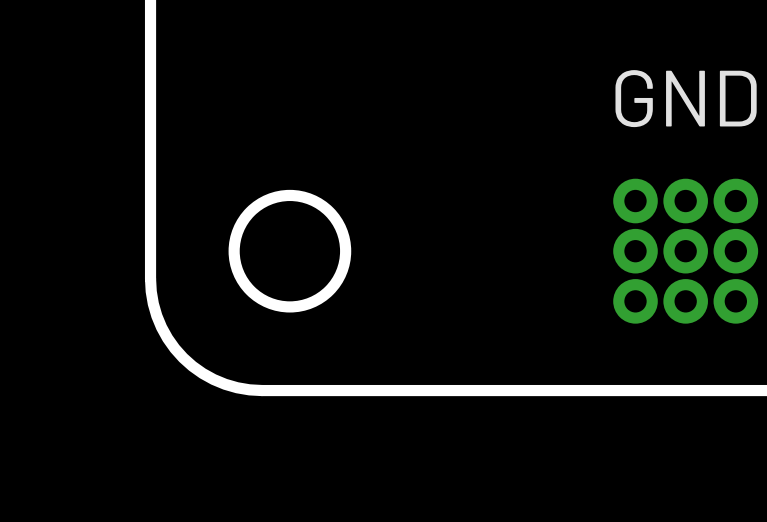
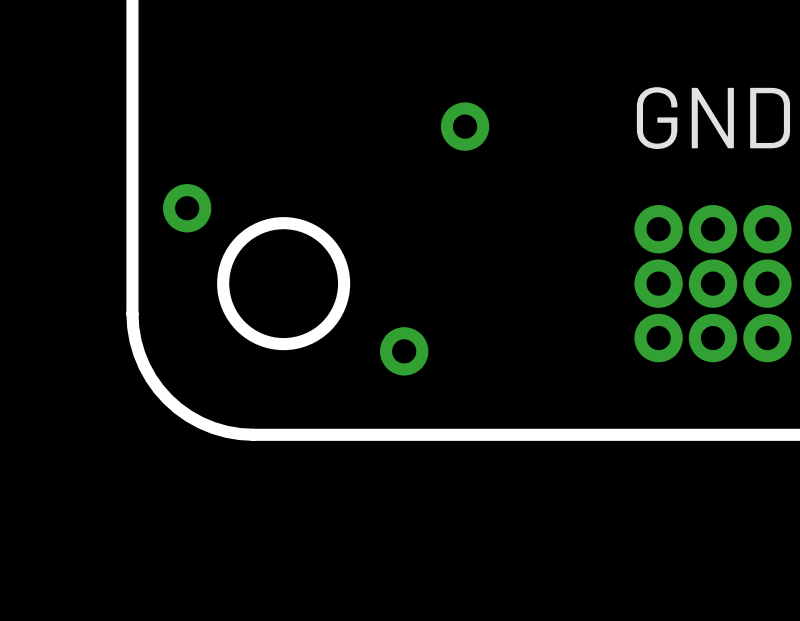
via: none -> (465, 126)
via: none -> (187, 208)
via: none -> (404, 351)

